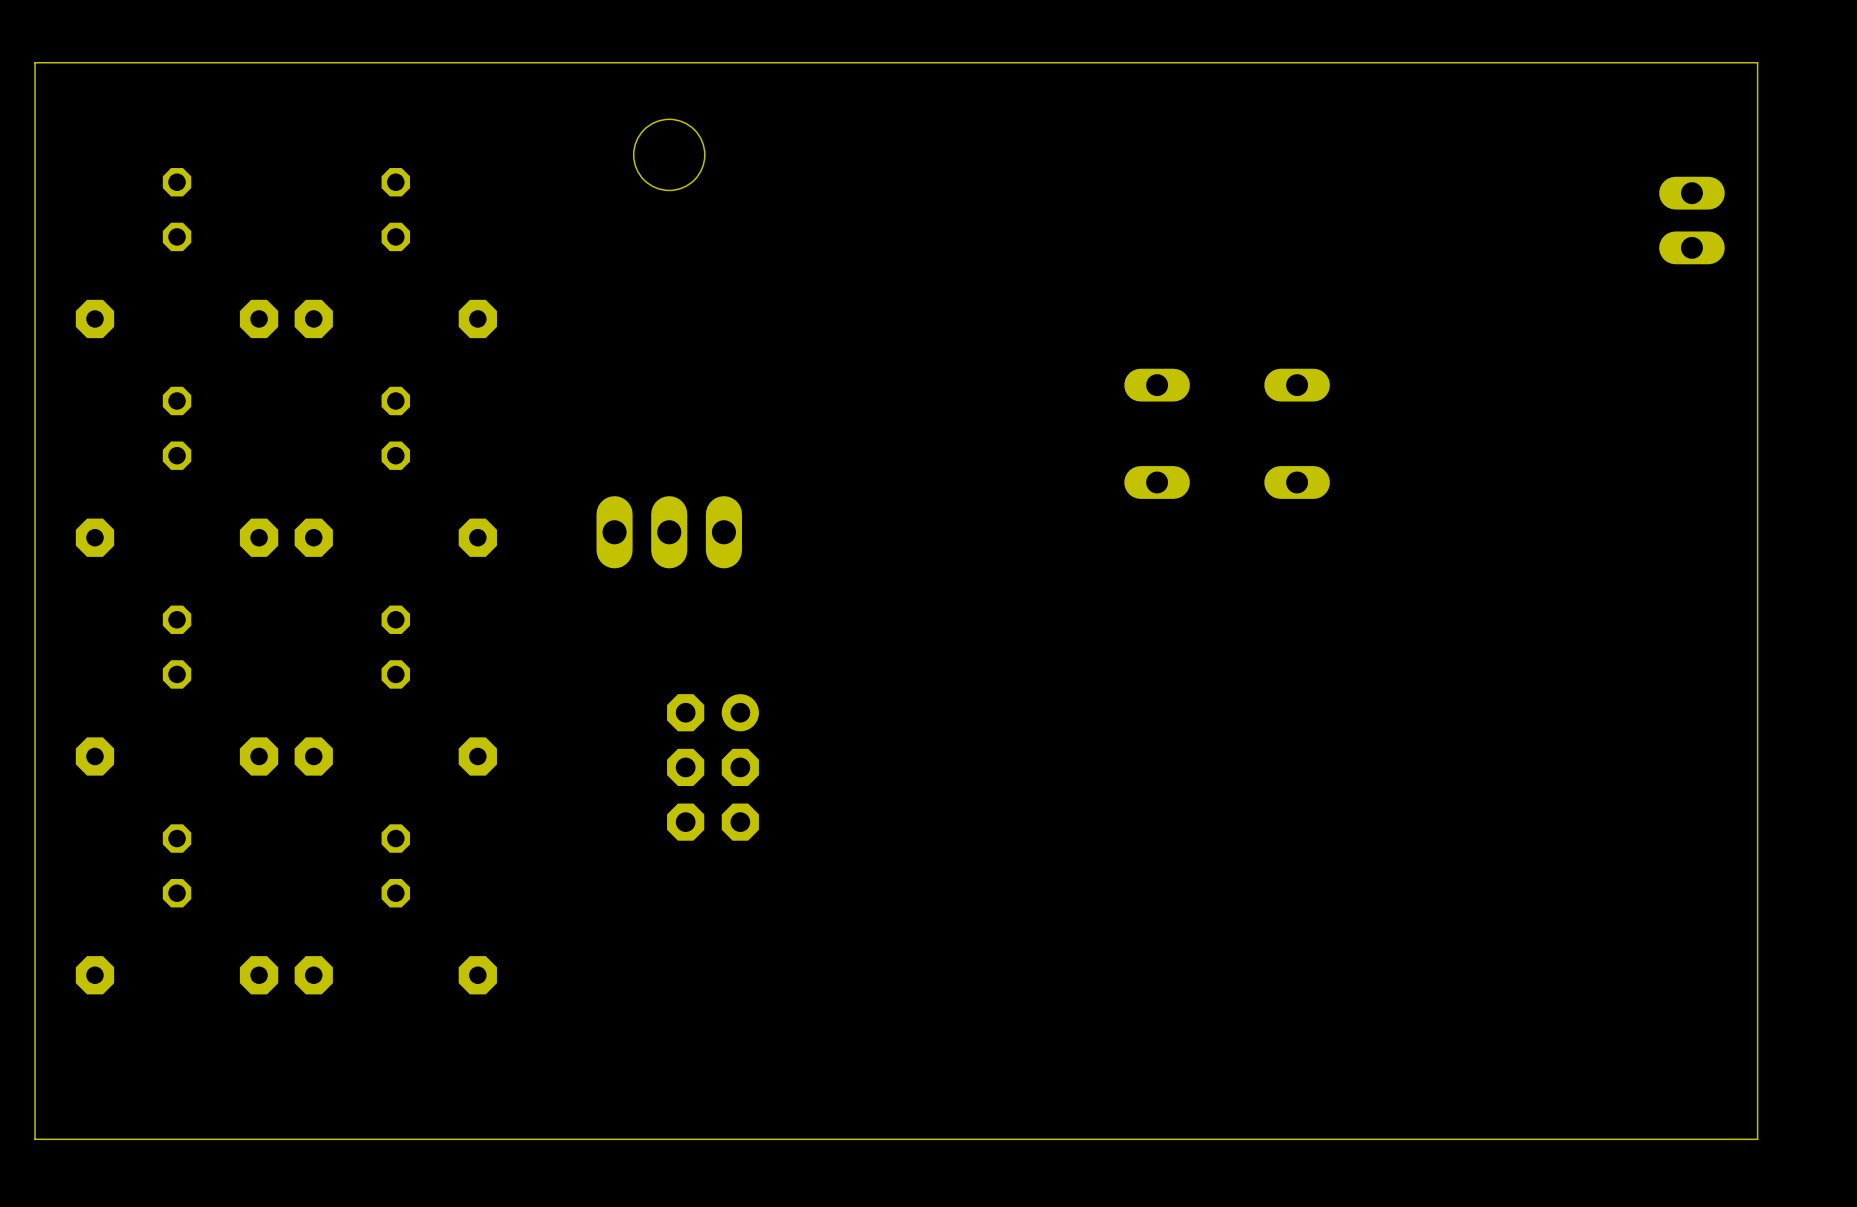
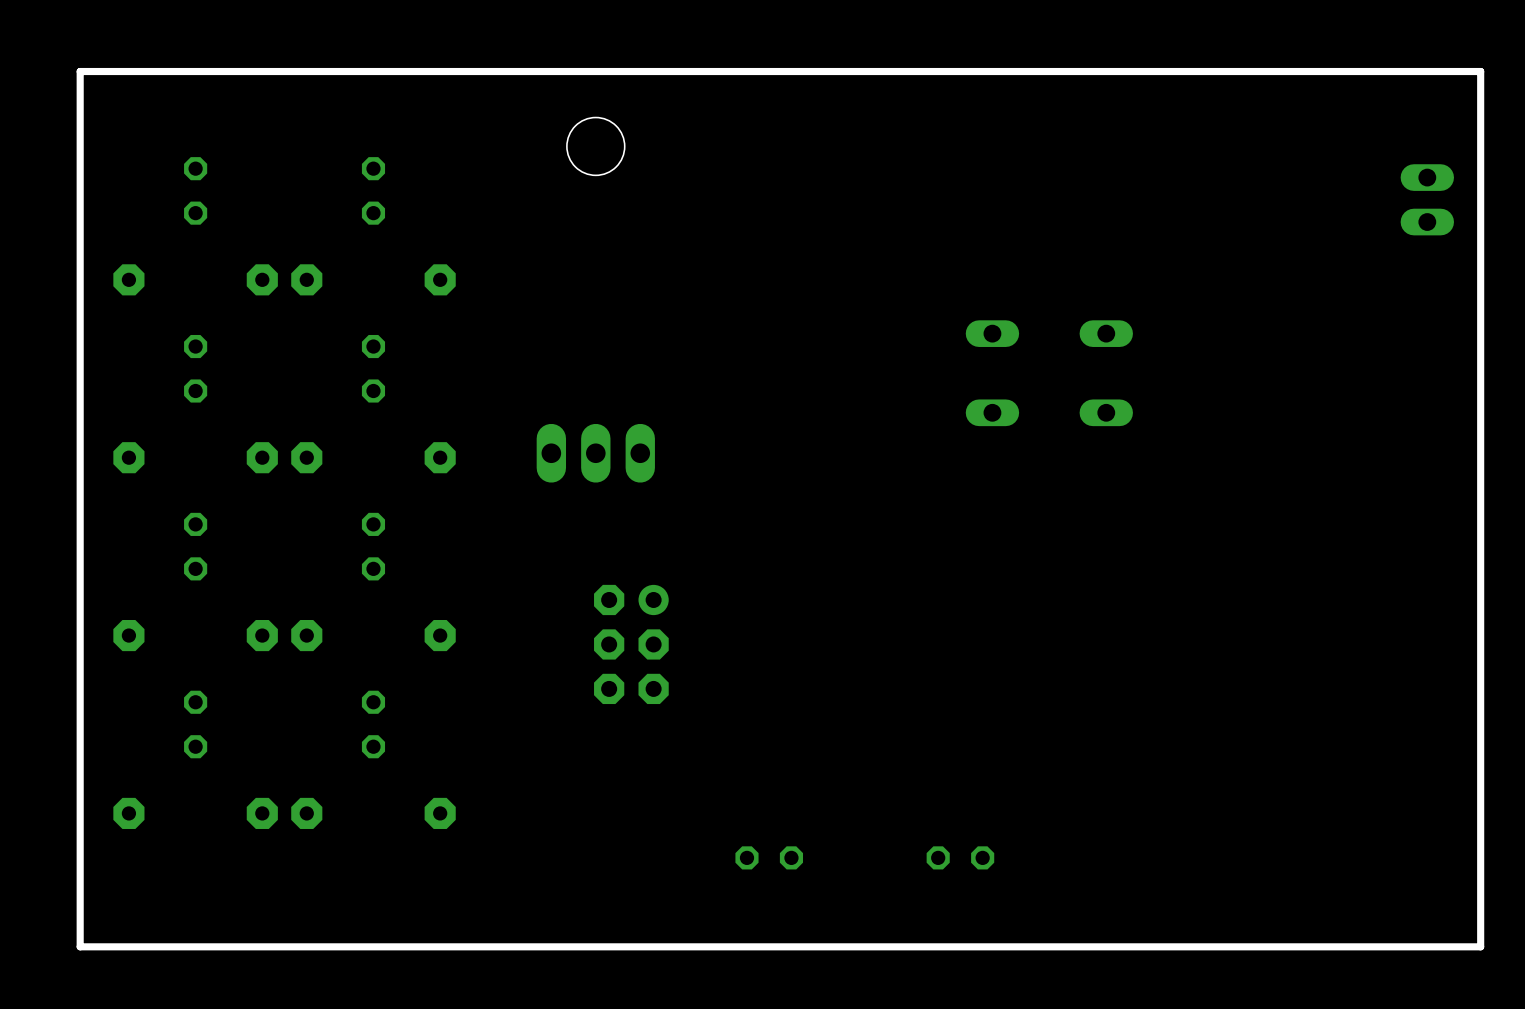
board edge width: thin (1757, 62) (35, 62) (35, 1139) (1757, 1139) (1757, 62) -> thick (1480, 71) (80, 71) (80, 946) (1480, 946) (1480, 71)
part: none -> (769, 857)
part: none -> (960, 857)

